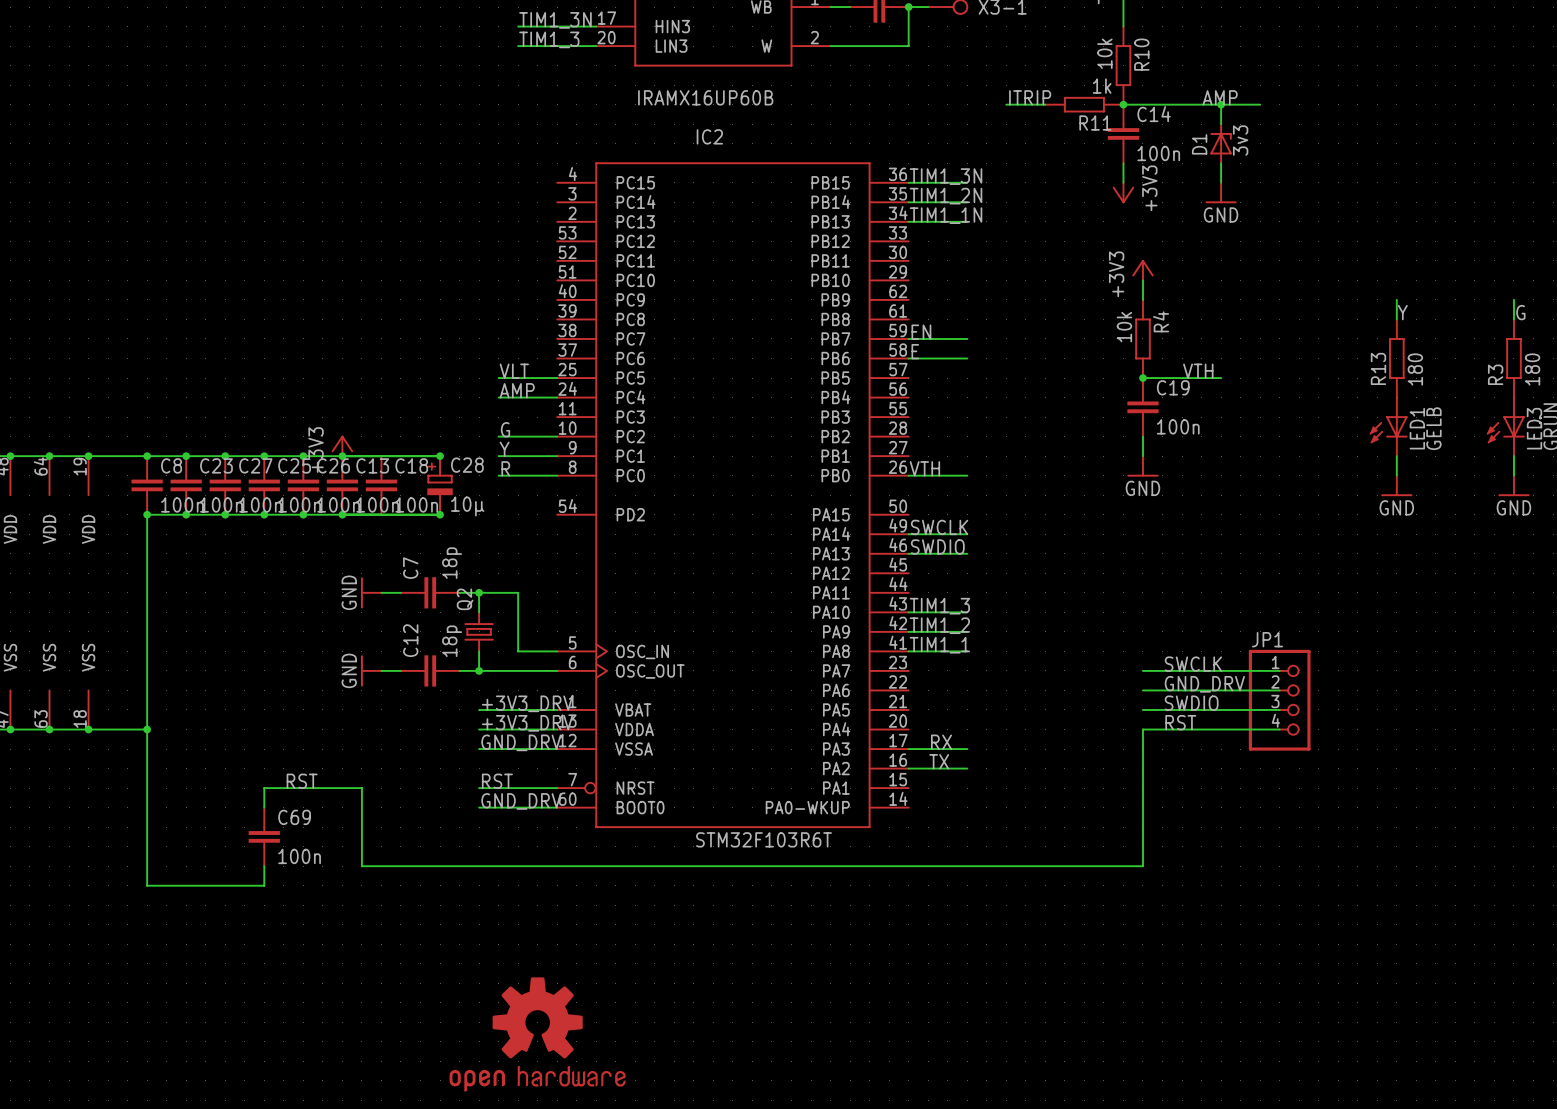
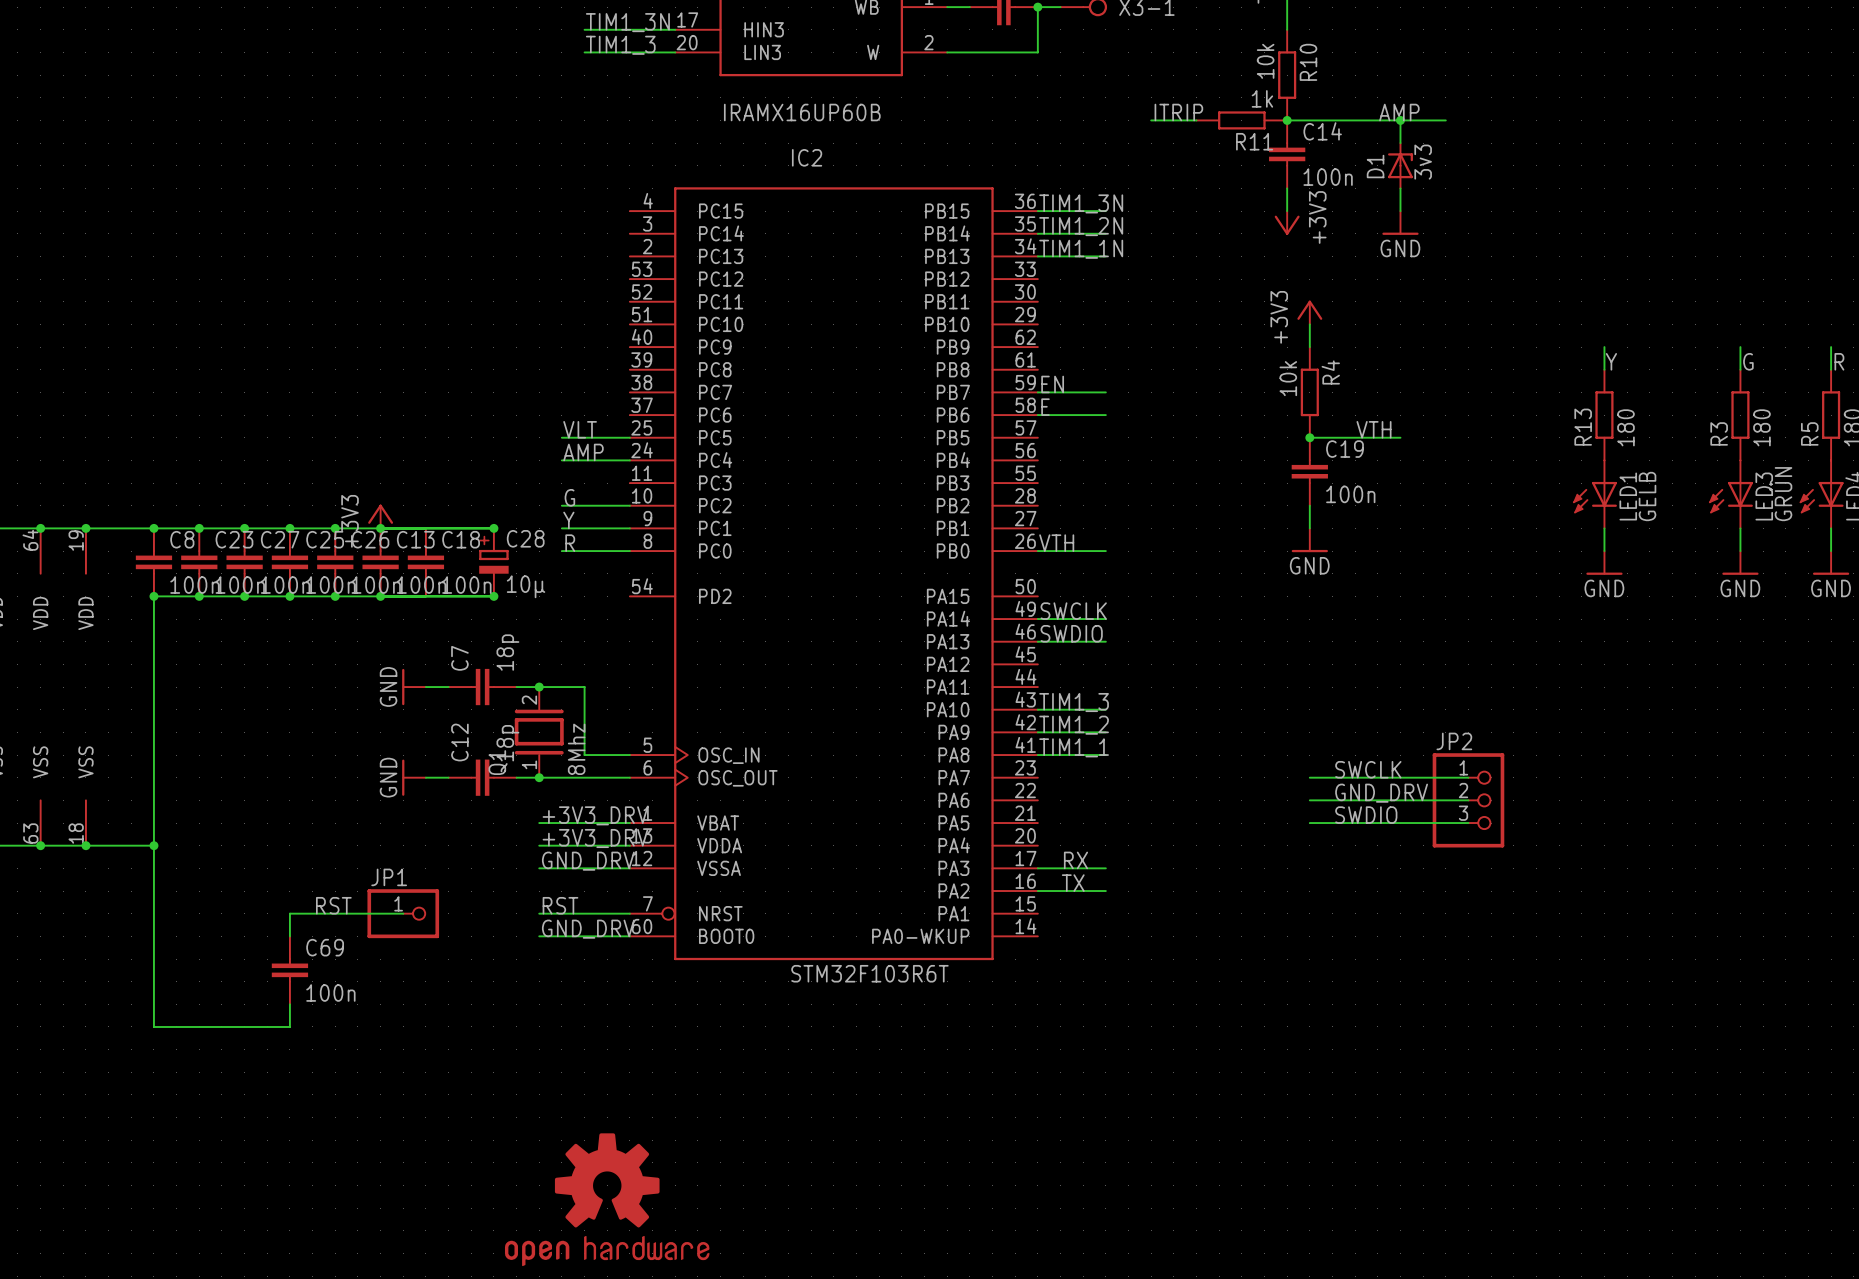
Q2: (479, 631) -> none
Q1: none -> 8Mhz (539, 732)
JP1 name position: JP1 (1267, 639) -> JP1 (389, 877)
JP1 symbol: [1248, 649, 1311, 751] -> [367, 889, 440, 939]
JP2: none -> (1468, 800)
label: RST (1180, 722) -> none
wire: (1279, 729) (1142, 729) (1142, 866) (361, 866) (361, 788) -> none

